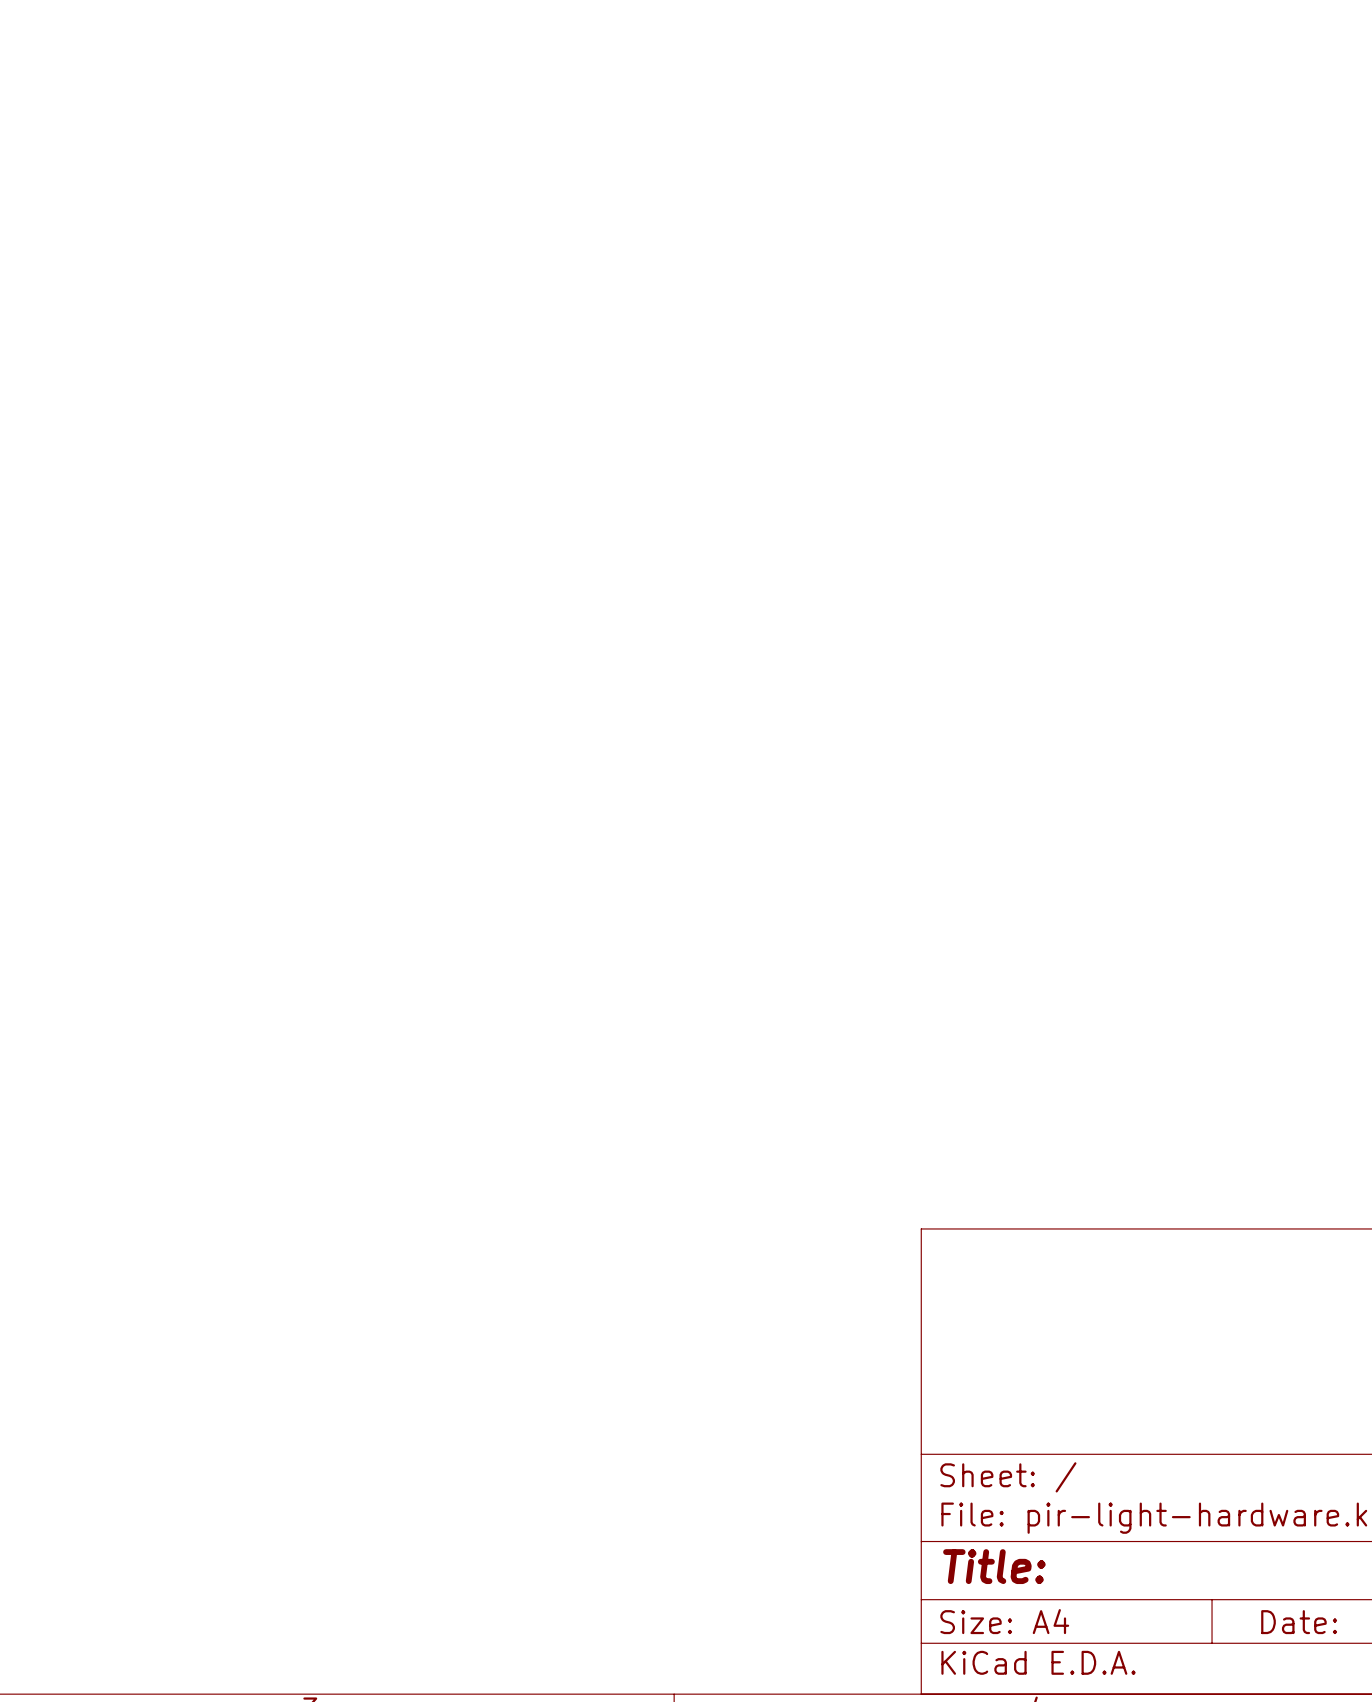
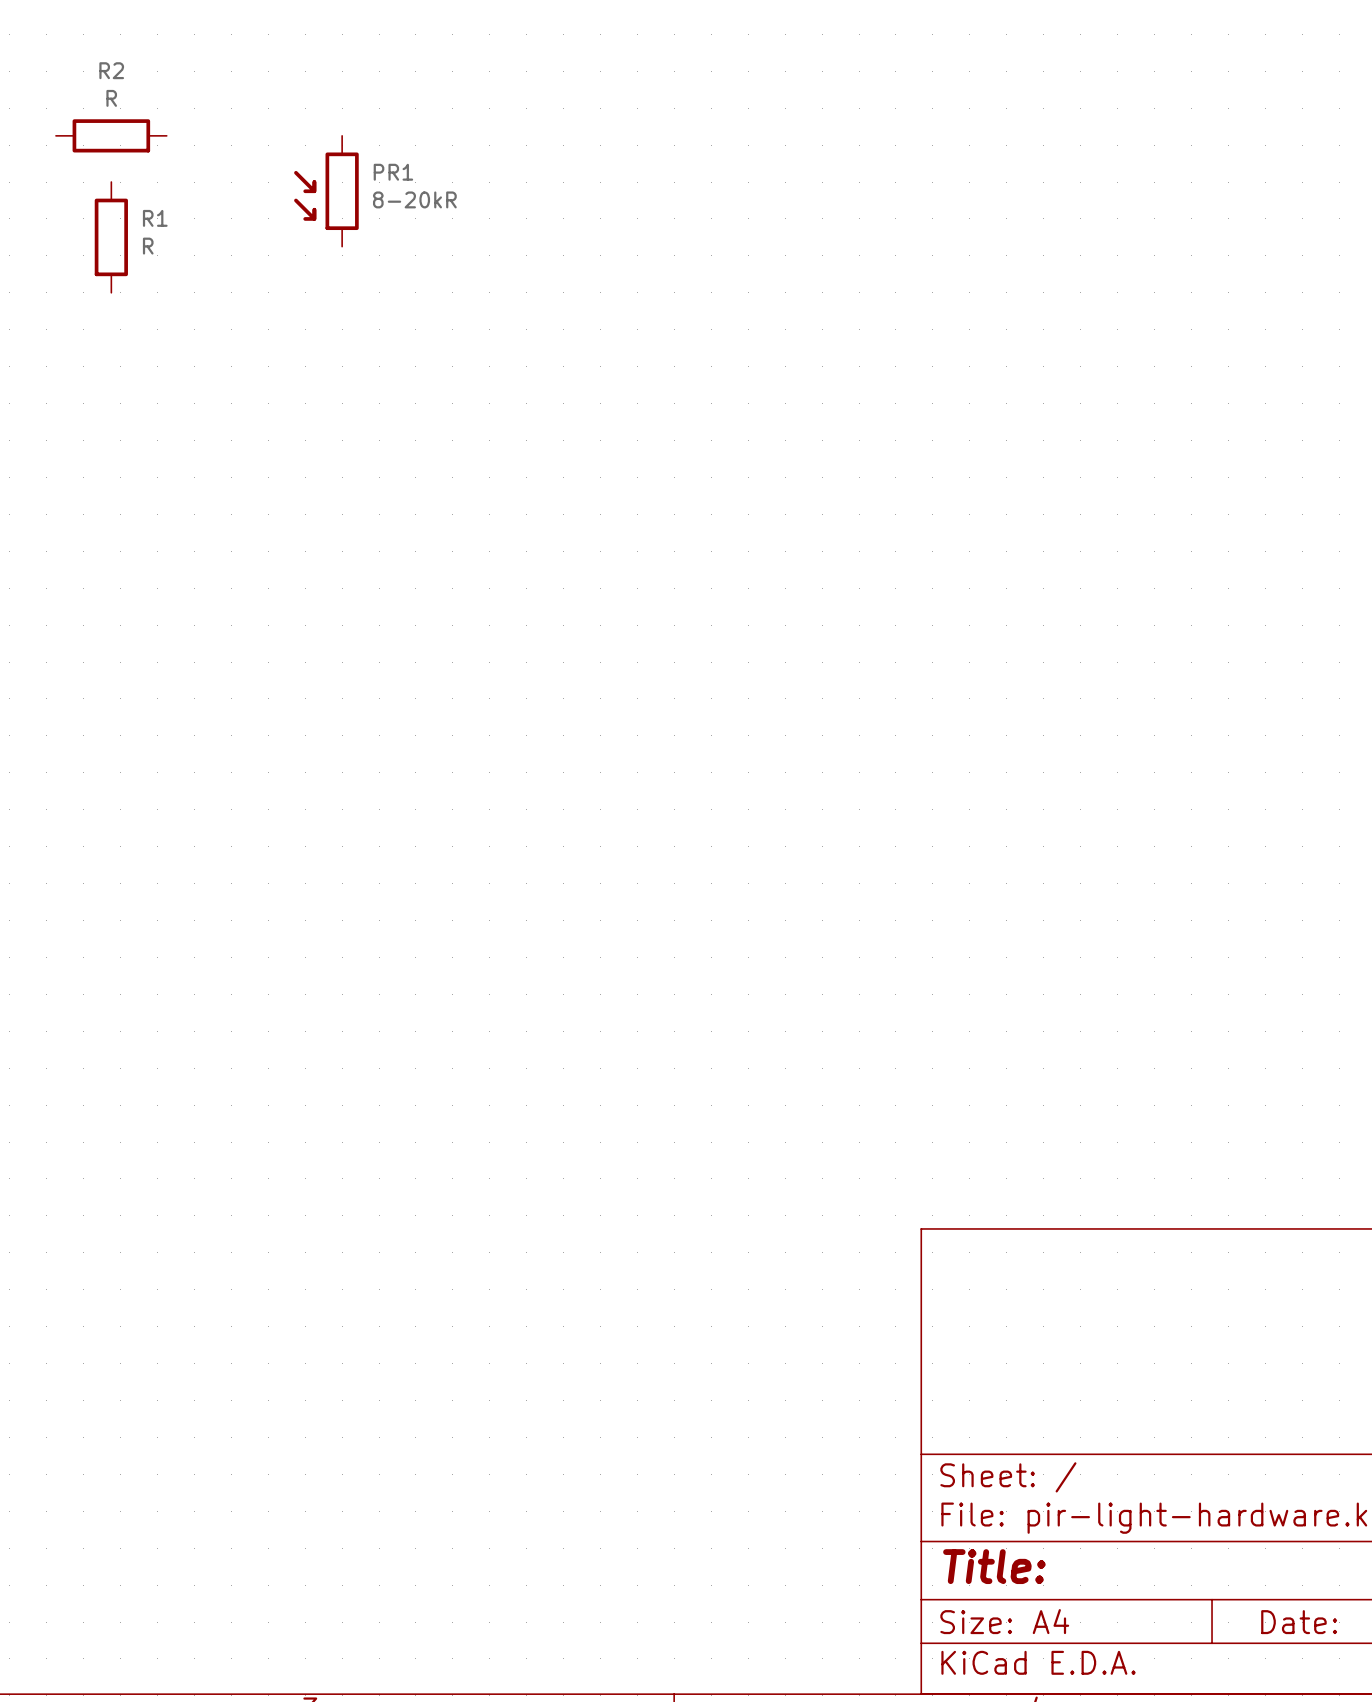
R2: none -> R (111, 135)
PR1: none -> 8-20kR (326, 191)
R1: none -> R (111, 237)

